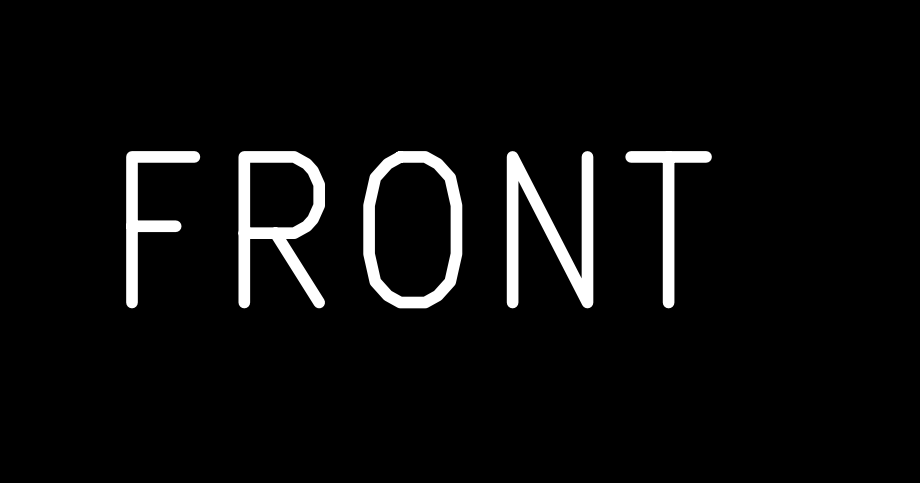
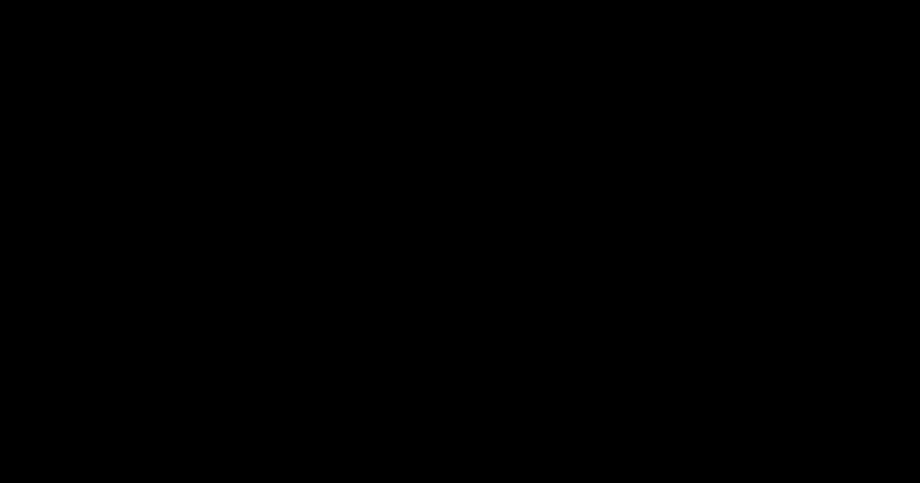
text: FRONT (419, 229) -> none

